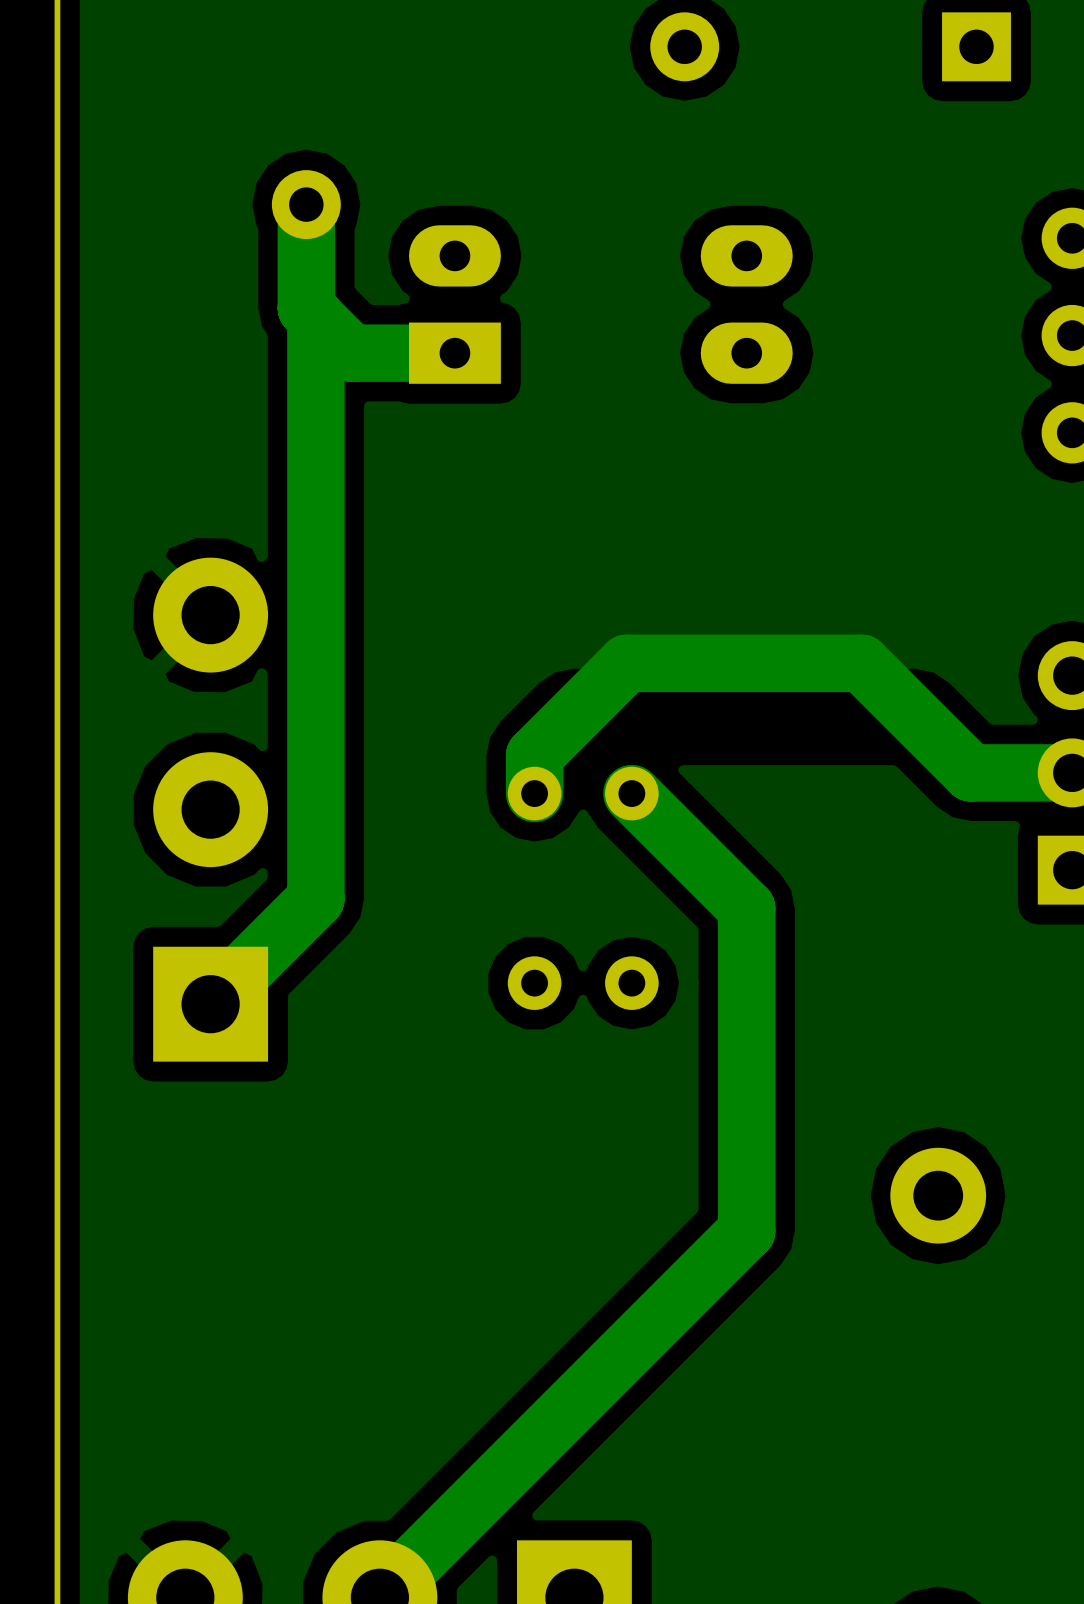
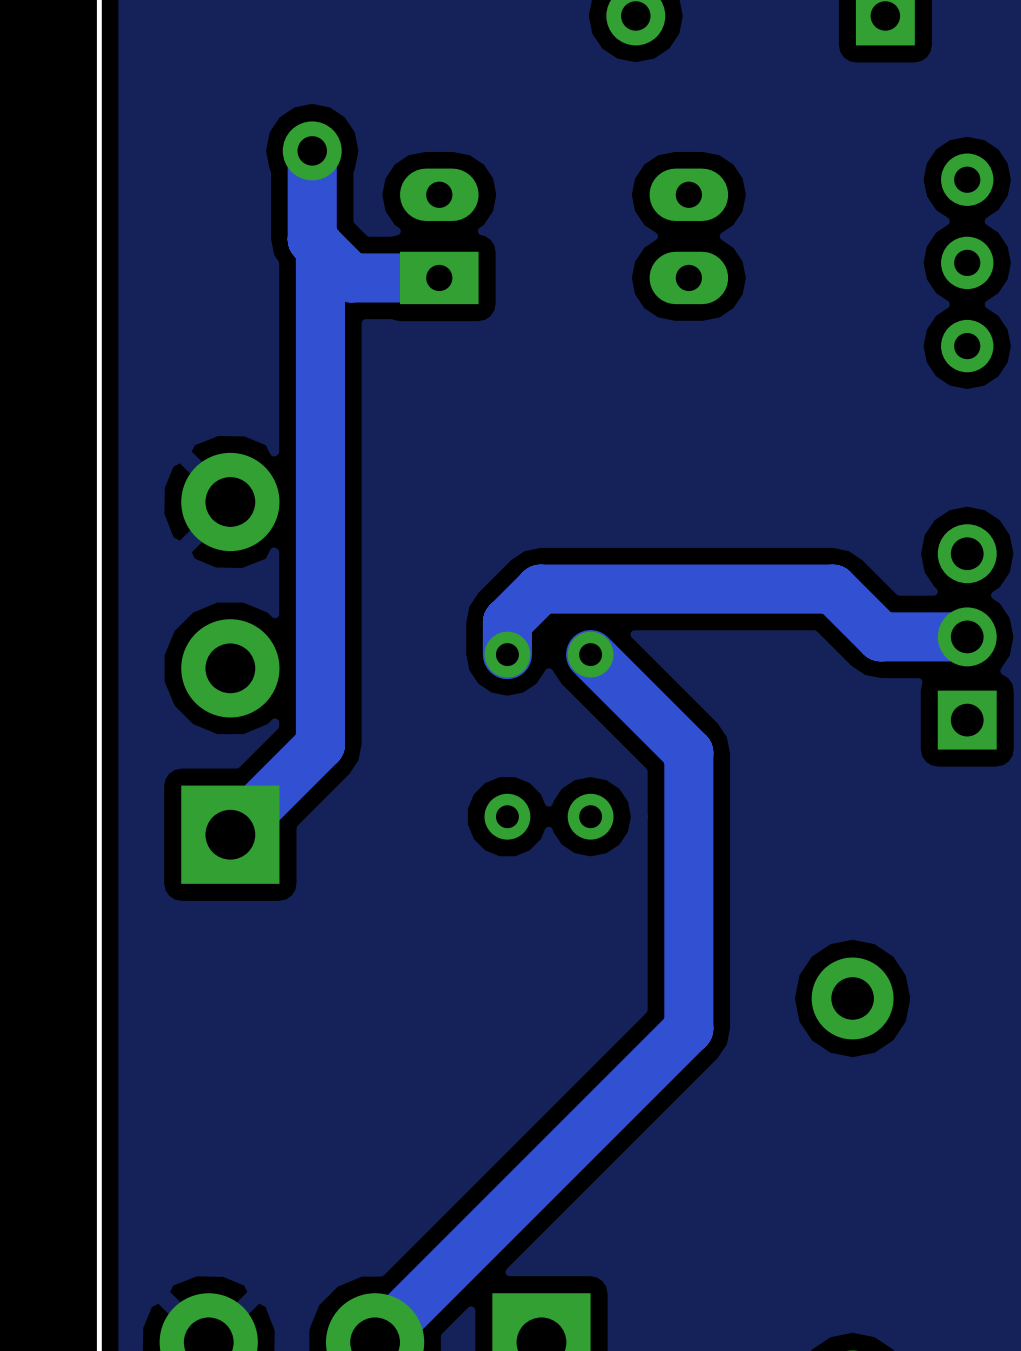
track: (915, 716) (861, 663) (626, 663) (573, 716) -> (832, 589) (540, 589)

